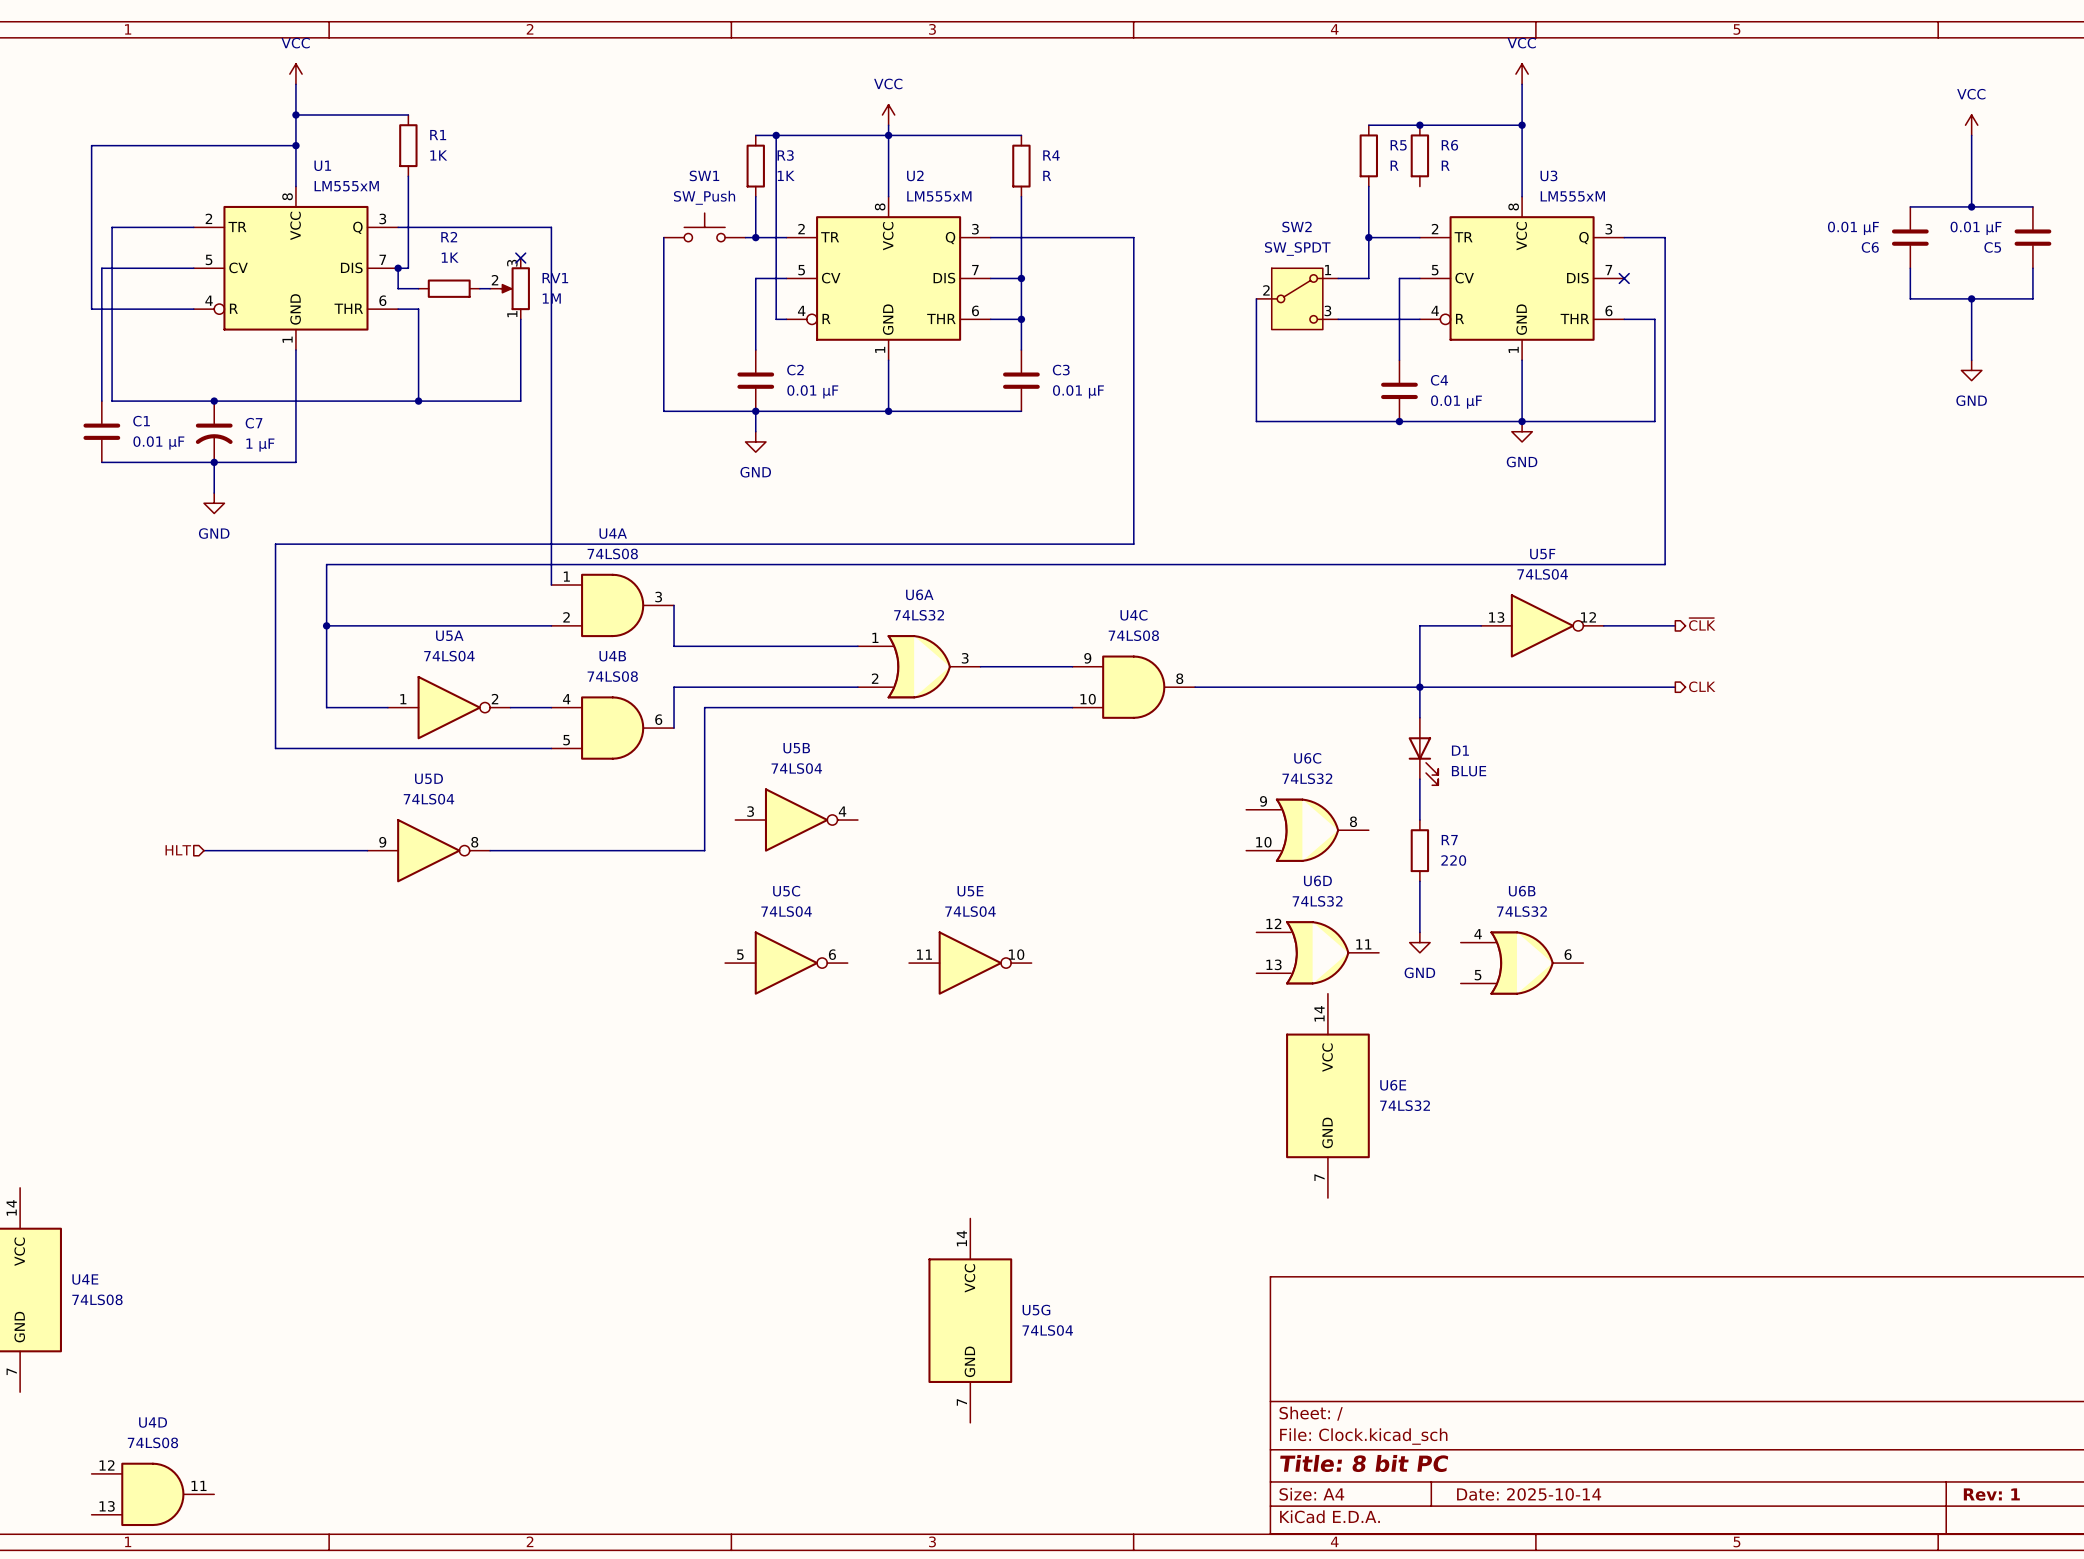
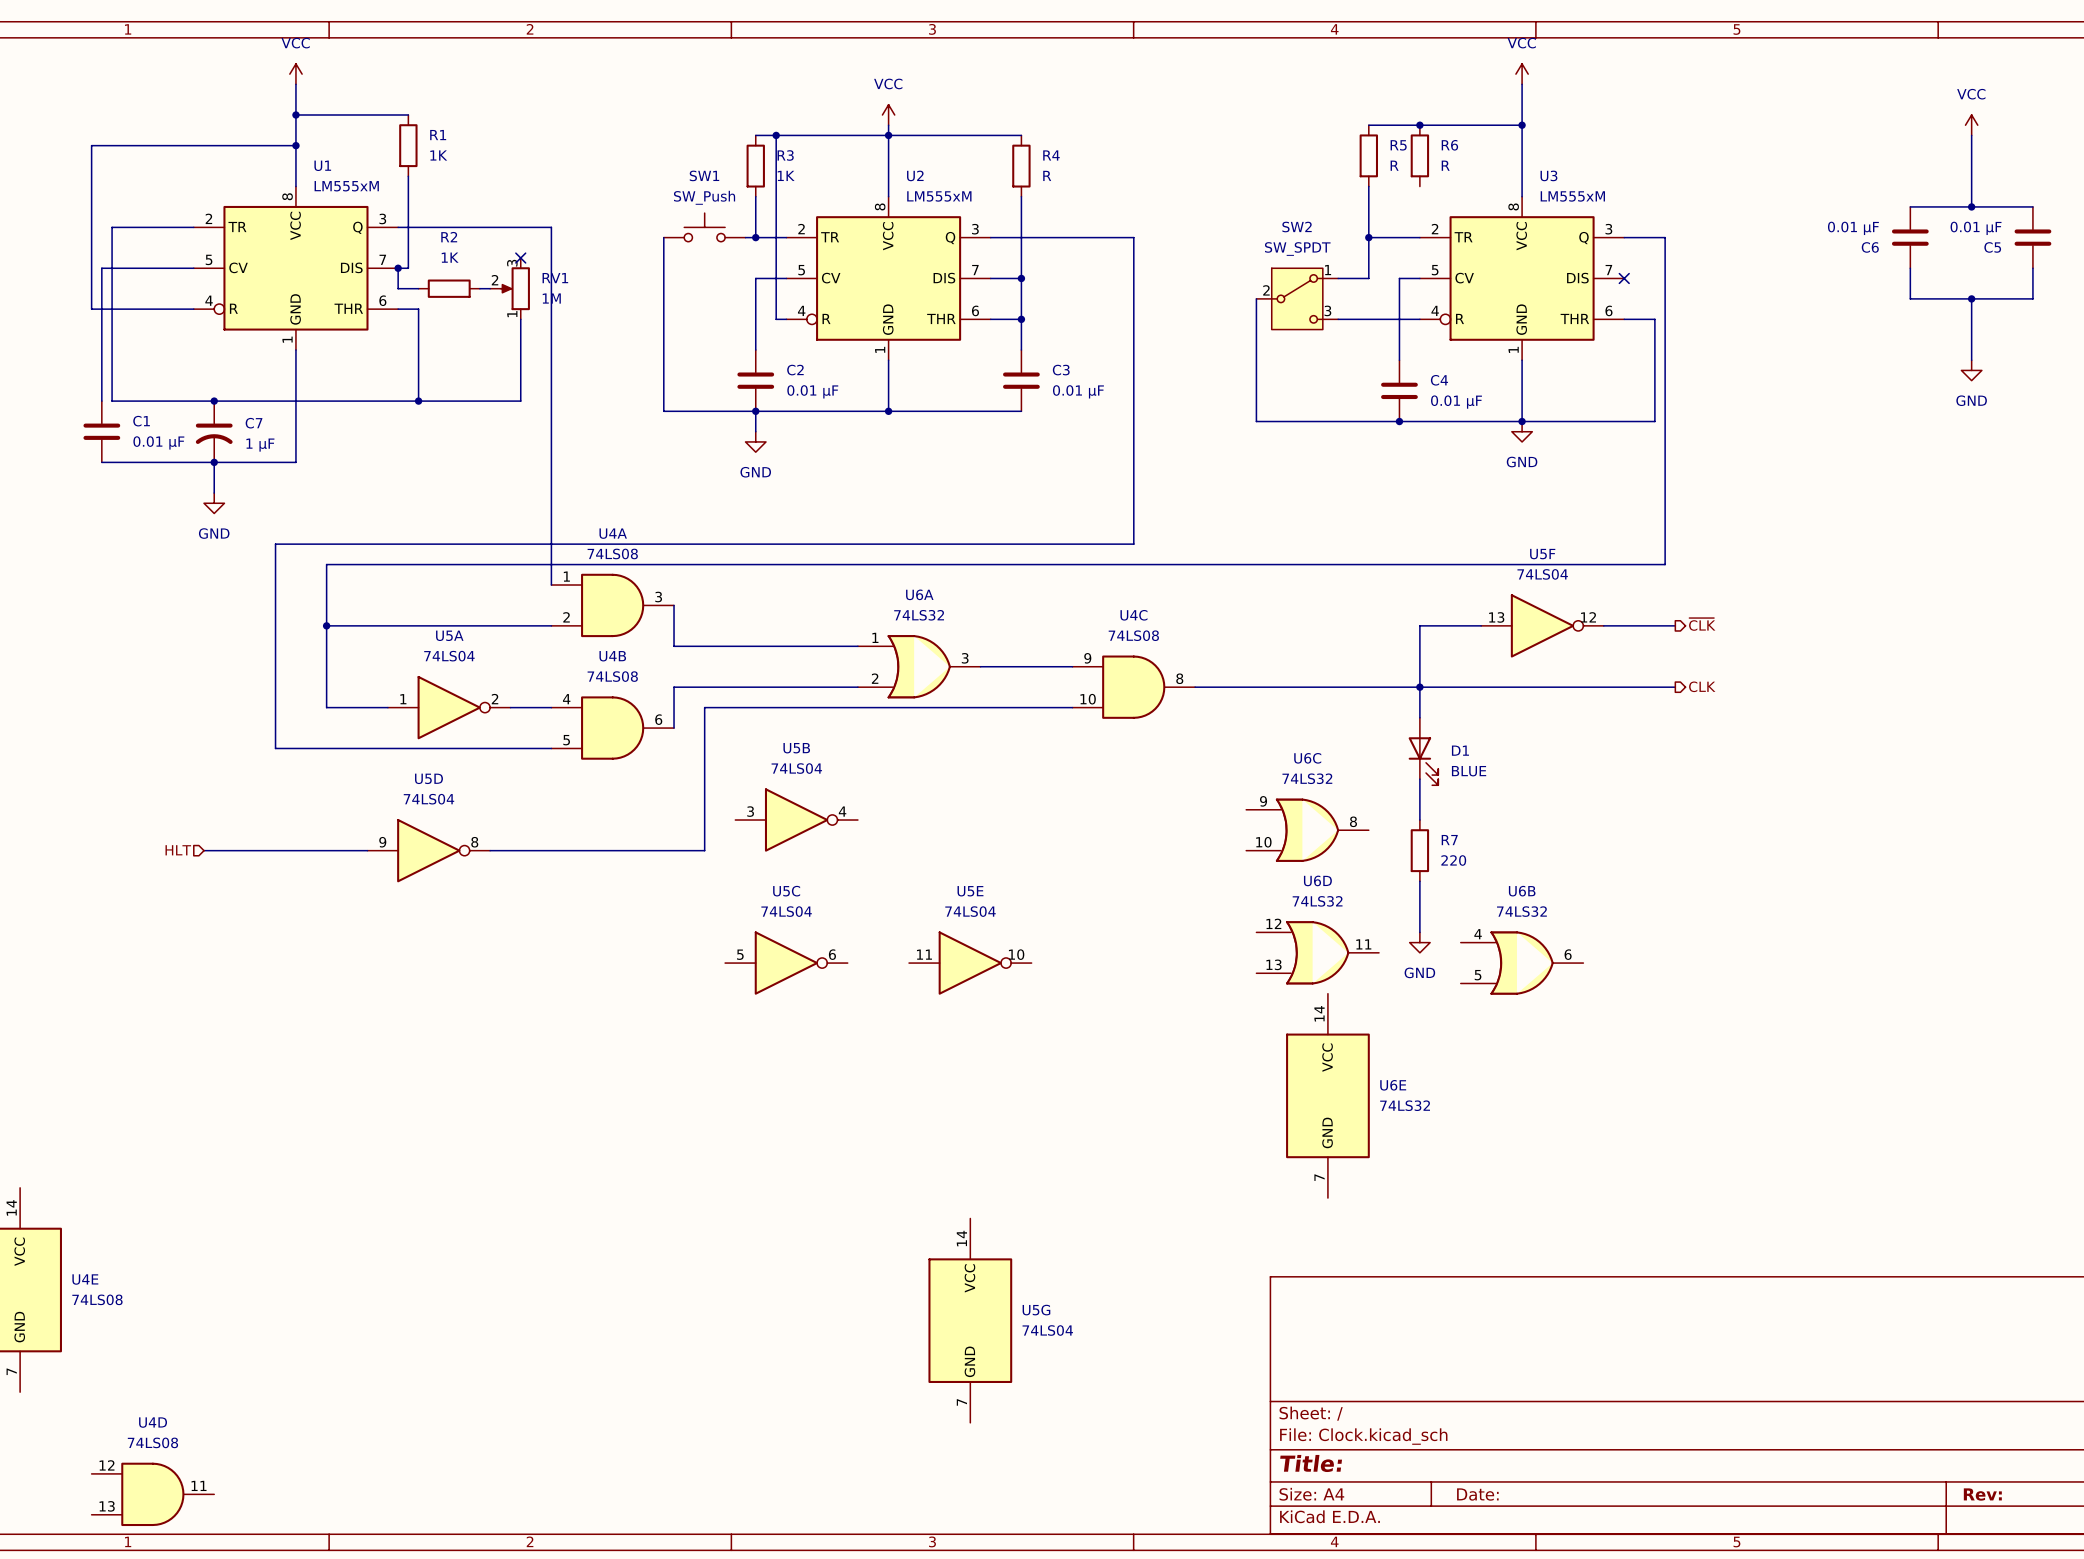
title block: Title: 8 bit PC (1364, 1463) -> Title: (1311, 1463)
title block: Date: 2025-10-14 (1529, 1494) -> Date: (1477, 1494)
title block: Rev: 1 (1991, 1494) -> Rev: (1982, 1494)

